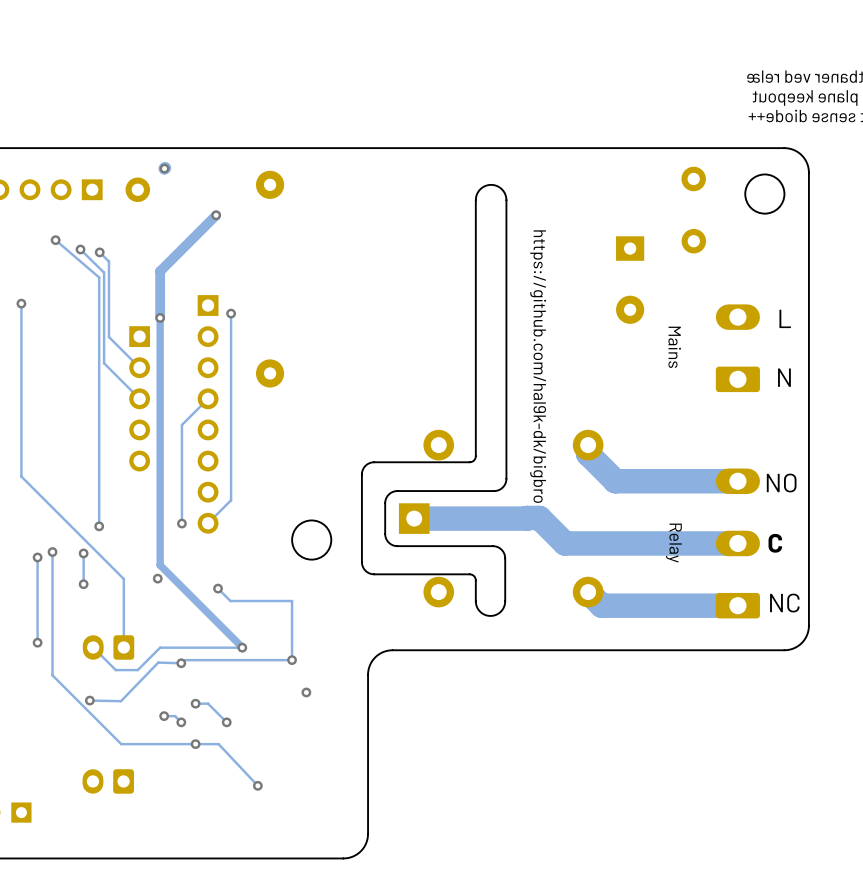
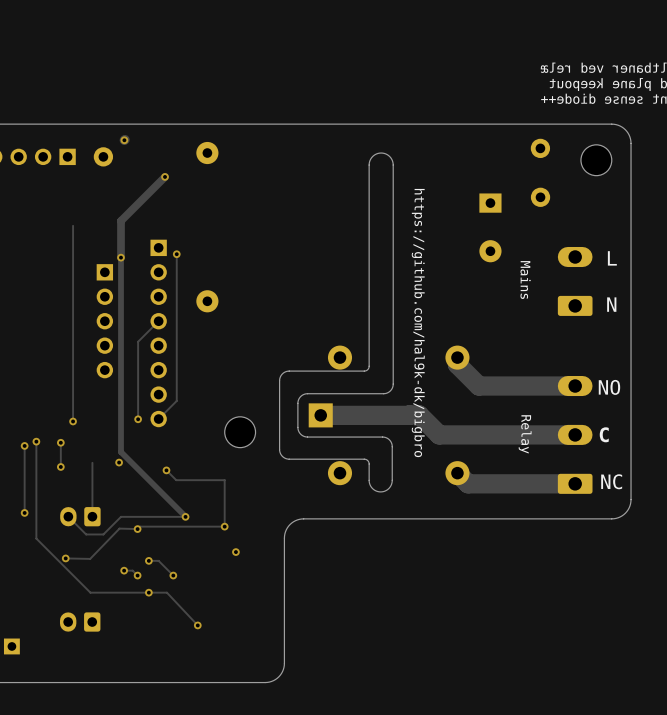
track: (55, 240) (99, 277) -> none
via: (55, 240) -> none
track: (80, 249) (104, 272) (104, 363) (139, 398) -> none
via: (80, 249) -> none
track: (99, 252) (108, 261) (108, 337) (139, 367) -> none
via: (99, 252) -> none
track: (21, 303) (21, 476) (123, 579) -> none
via: (21, 303) -> none

